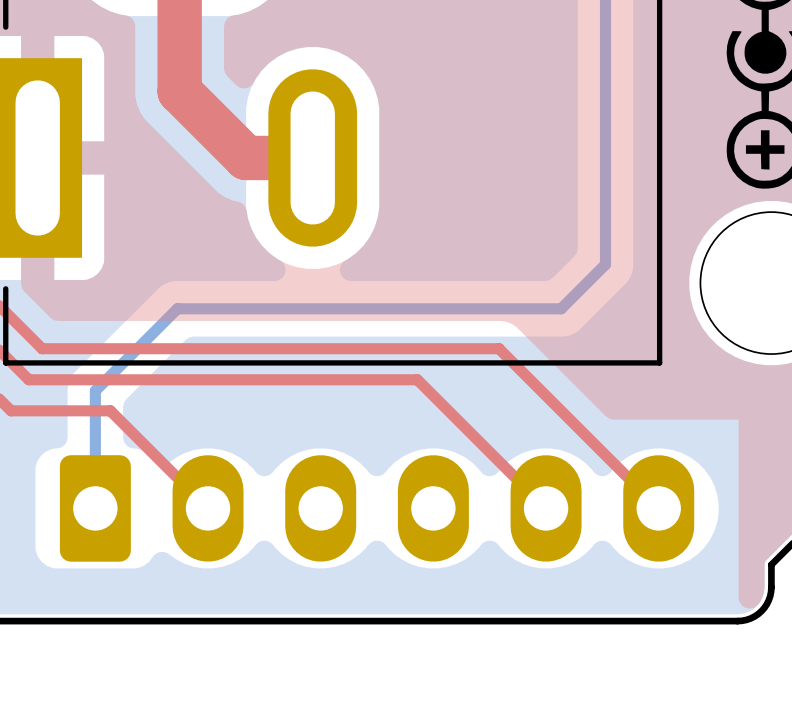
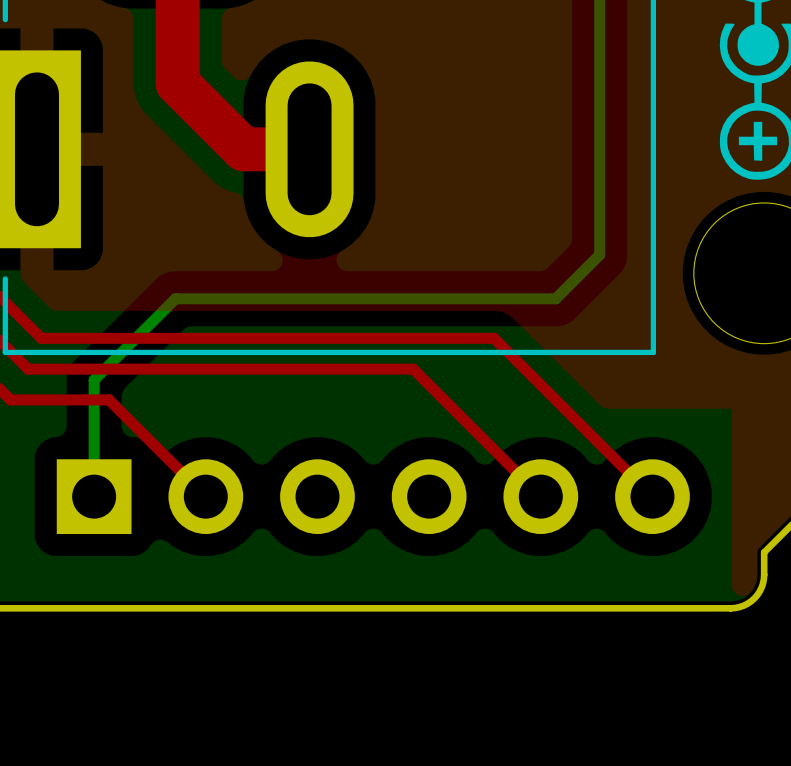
part footprint: [59, 455, 695, 562] -> [56, 459, 690, 535]

